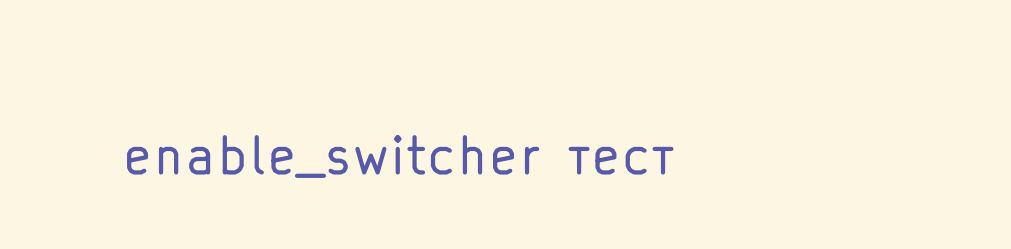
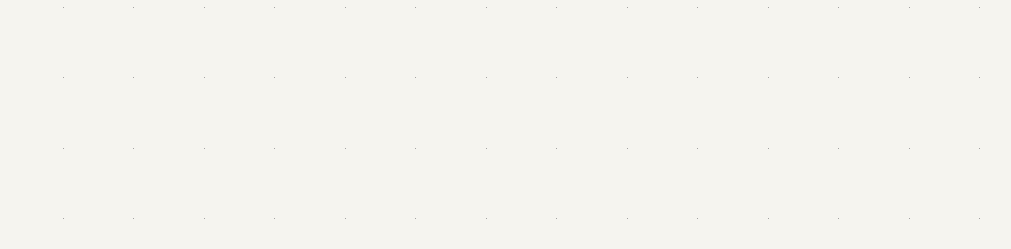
text: enable_switcher тест (400, 156) -> none

